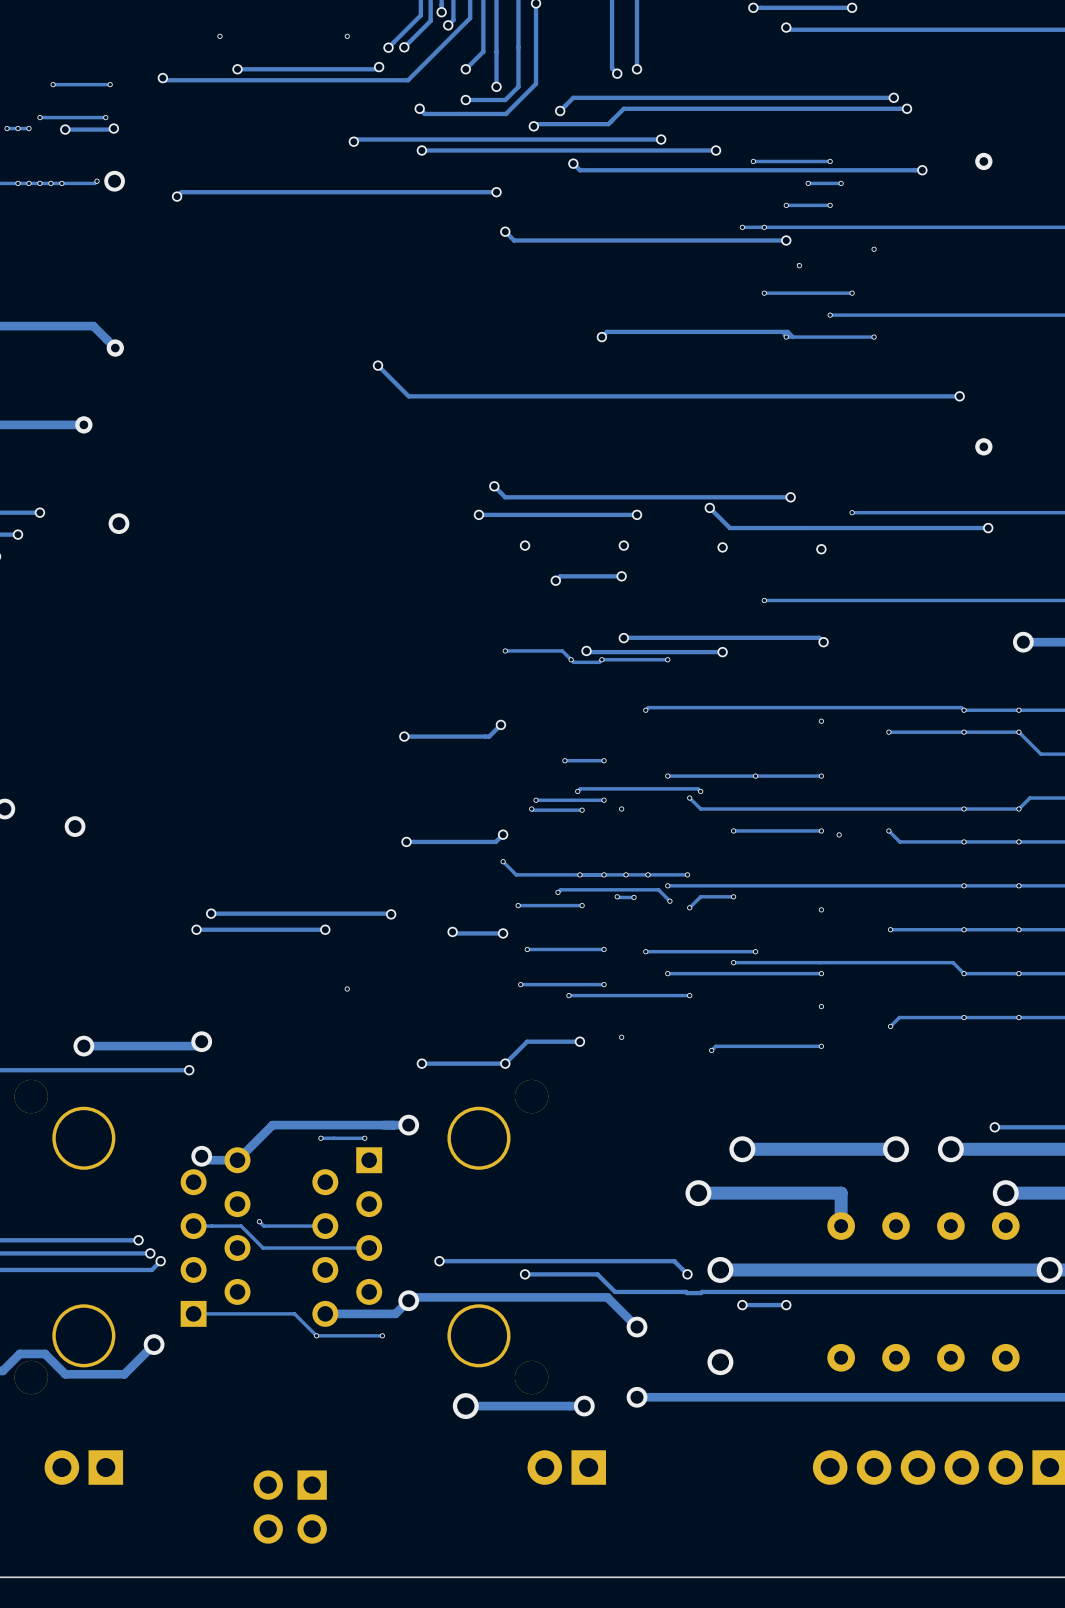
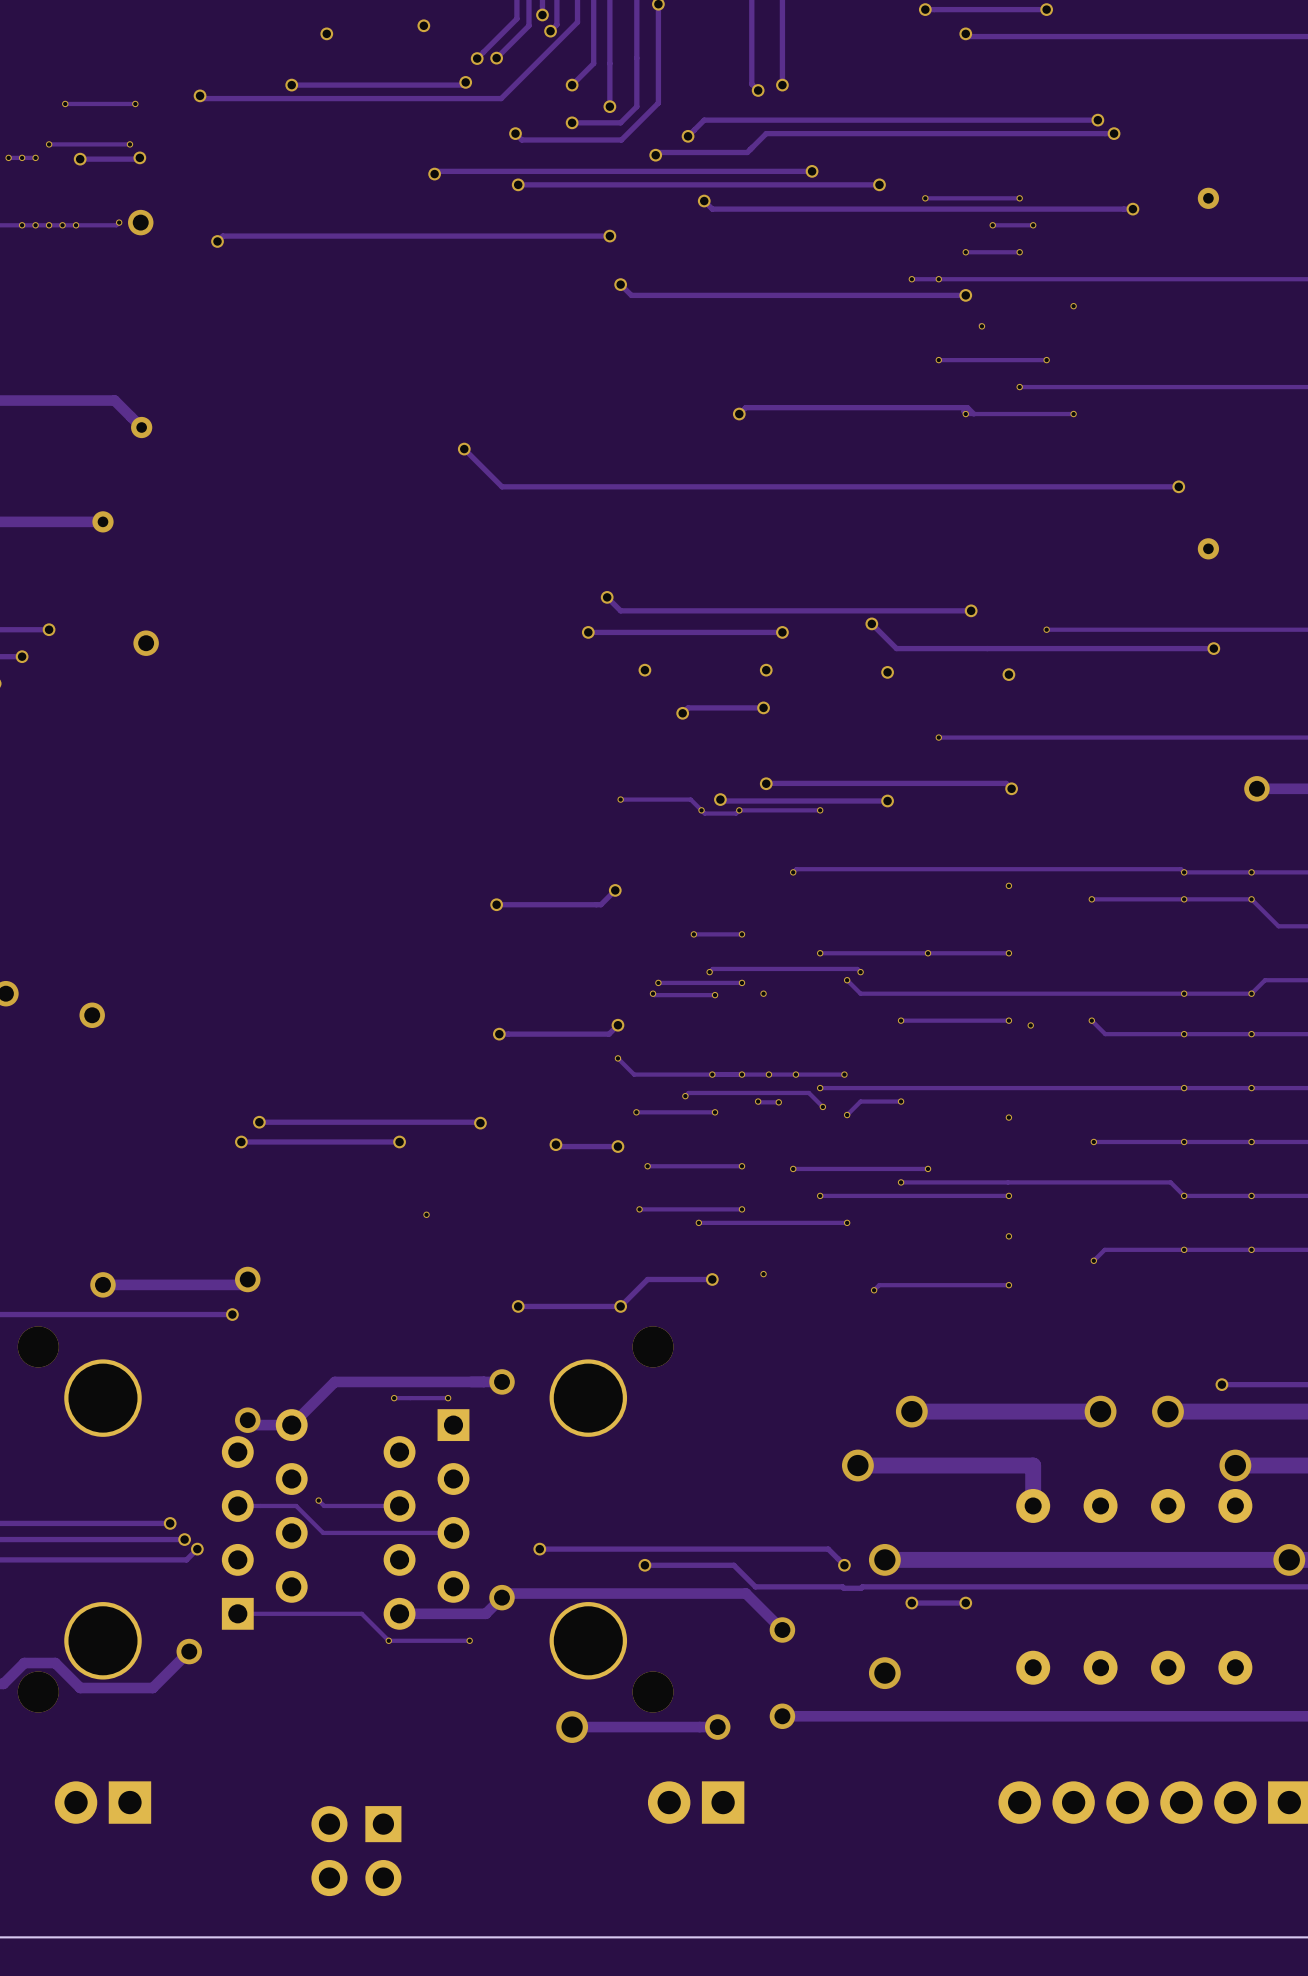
via: none -> (423, 25)
via: none -> (326, 33)
via: (219, 36) -> none
via: (347, 36) -> none

